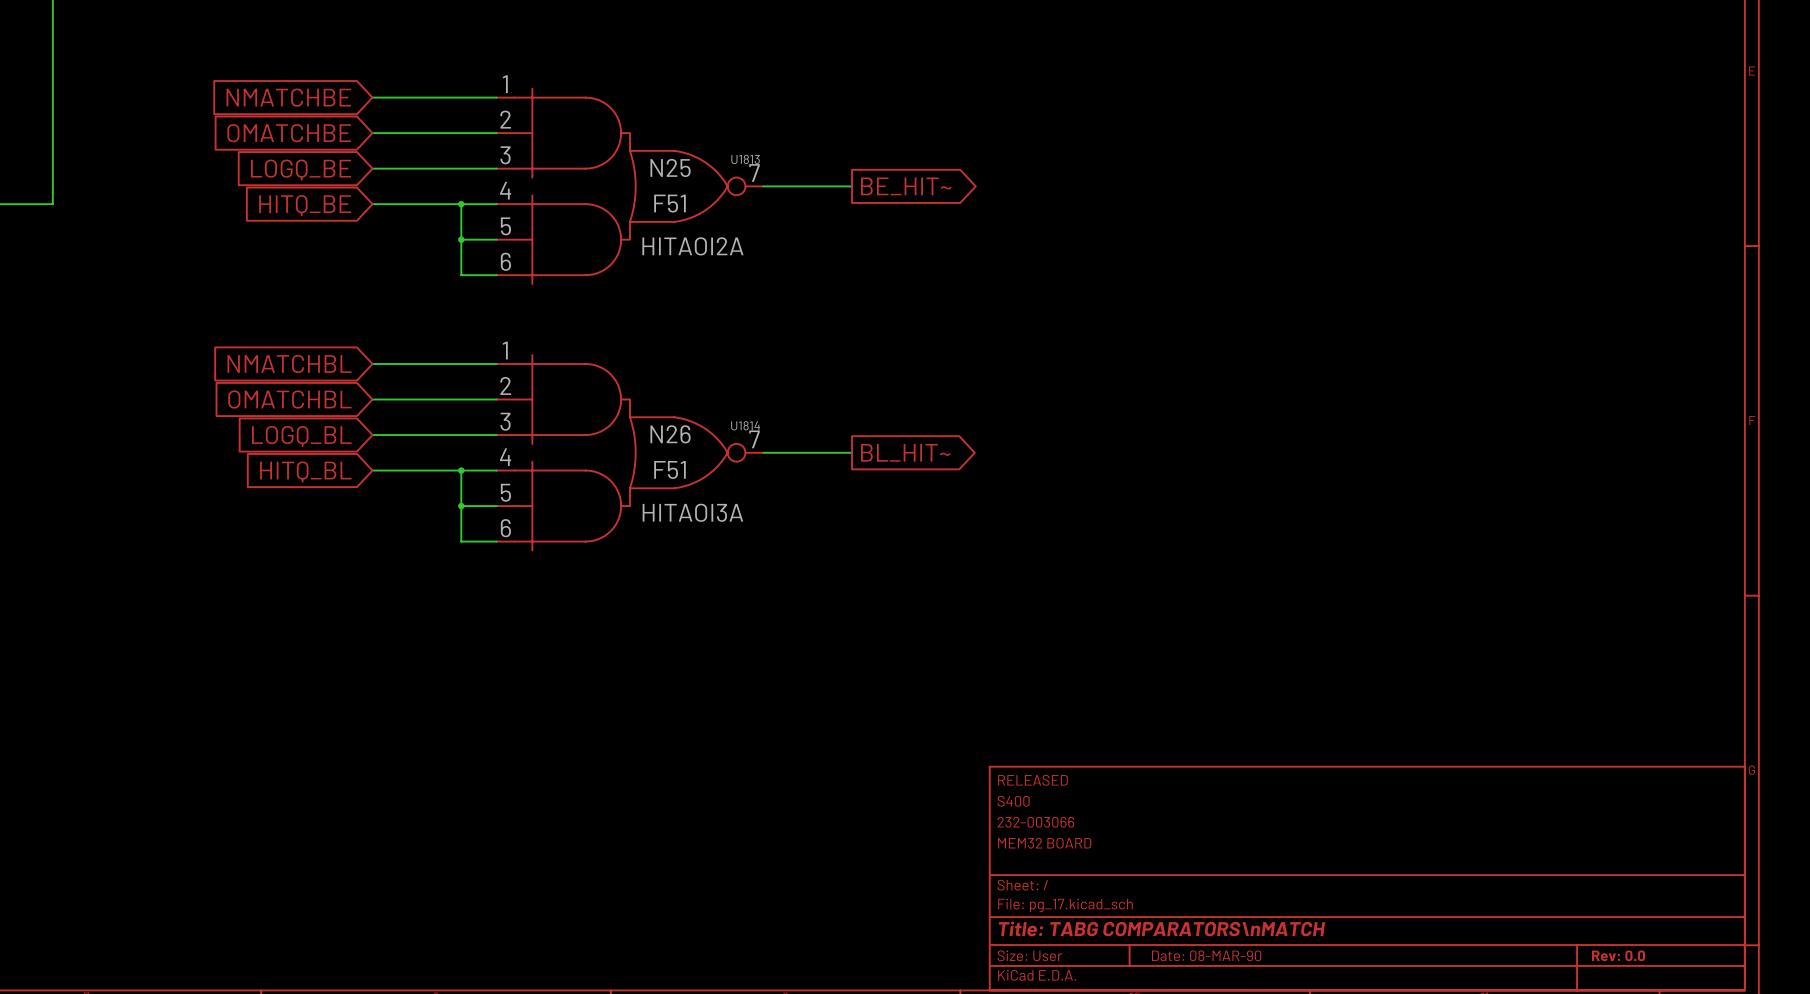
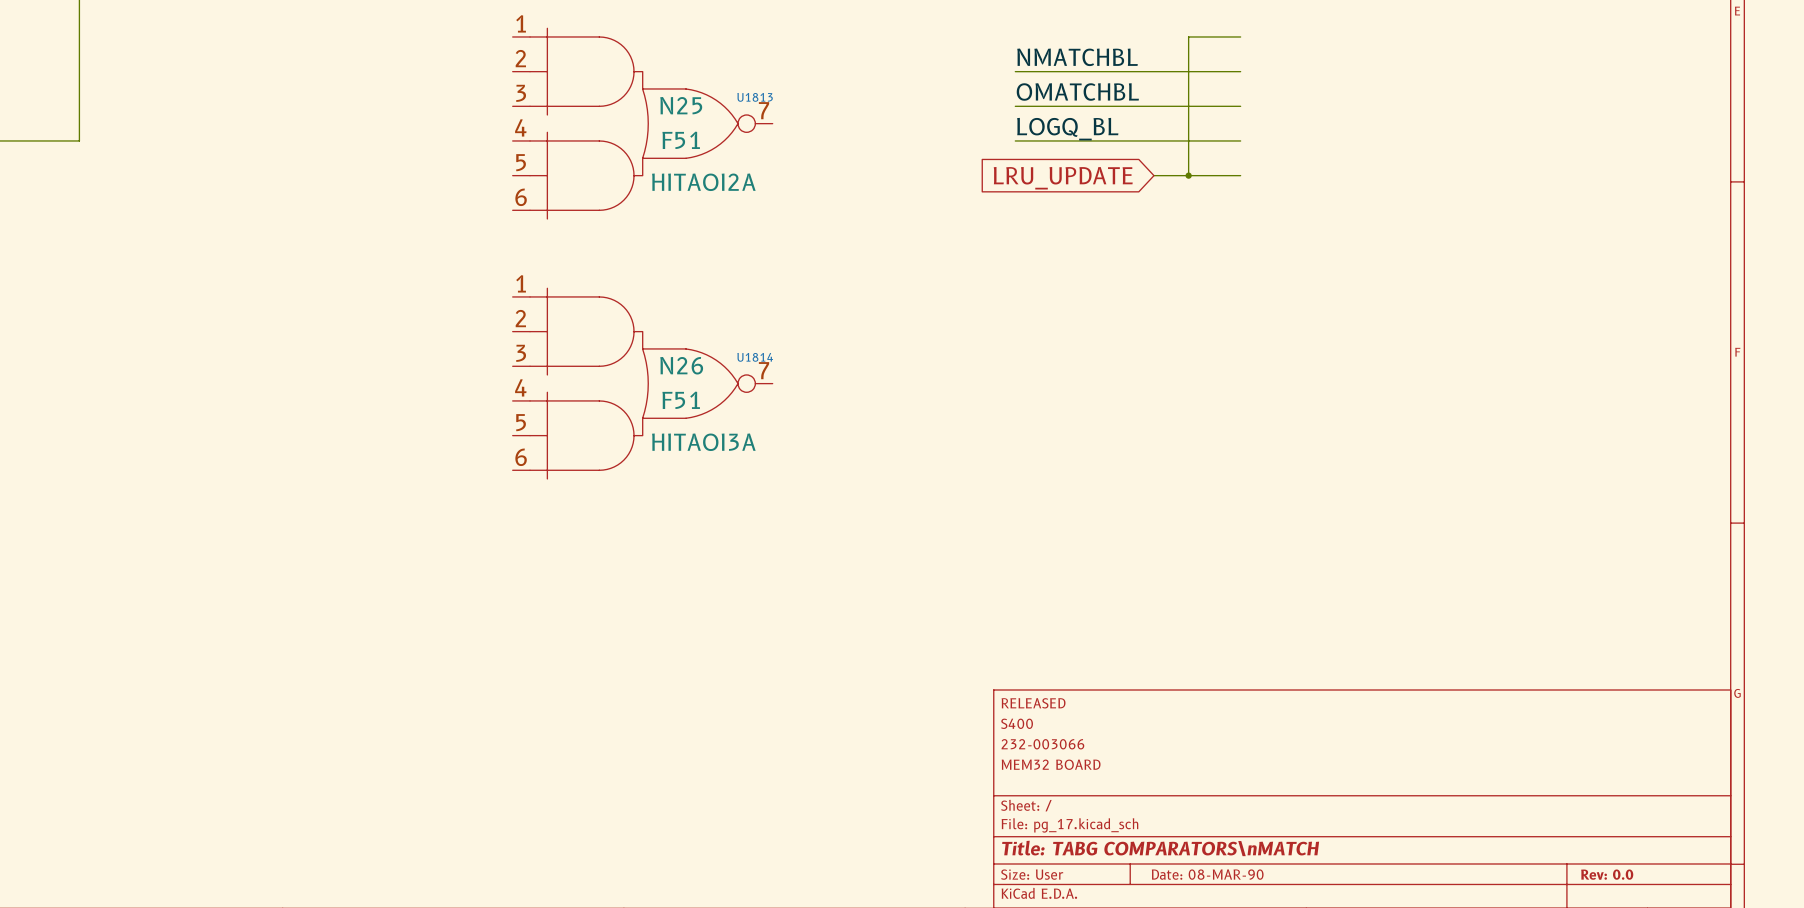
global label: NMATCHBE (288, 97) -> none
wire: (372, 97) (496, 97) -> none
wire: none -> (1240, 36) (1188, 36) (1188, 175)
label: none -> NMATCHBL (1077, 57)
global label: OMATCHBE (289, 133) -> none
wire: (372, 133) (496, 133) -> none
wire: none -> (1015, 71) (1240, 71)
label: none -> OMATCHBL (1077, 91)
wire: (372, 168) (496, 168) -> none
wire: none -> (1015, 106) (1240, 106)
global label: LOGQ_BE (301, 169) -> none
wire: (763, 186) (852, 186) -> none
global label: BE_HIT~ (906, 186) -> none
label: none -> LOGQ_BL (1067, 129)
wire: (372, 204) (496, 204) -> none
wire: (461, 204) (461, 275) (496, 275) -> none
junction: (461, 204) -> none
wire: none -> (1015, 140) (1240, 140)
global label: HITQ_BE (305, 205) -> none
wire: (461, 239) (496, 239) -> none
junction: (461, 239) -> none
global label: none -> LRU_UPDATE (1063, 178)
wire: none -> (1153, 175) (1240, 175)
junction: none -> (1188, 175)
wire: (372, 363) (496, 363) -> none
global label: NMATCHBL (289, 364) -> none
global label: OMATCHBL (289, 399) -> none
wire: (372, 399) (496, 399) -> none
wire: (372, 435) (496, 435) -> none
global label: LOGQ_BL (301, 436) -> none
wire: (763, 452) (852, 452) -> none
global label: BL_HIT~ (905, 452) -> none
wire: (372, 470) (496, 470) -> none
wire: (461, 470) (461, 541) (496, 541) -> none
junction: (461, 470) -> none
global label: HITQ_BL (305, 471) -> none
wire: (461, 506) (496, 506) -> none
junction: (461, 506) -> none

